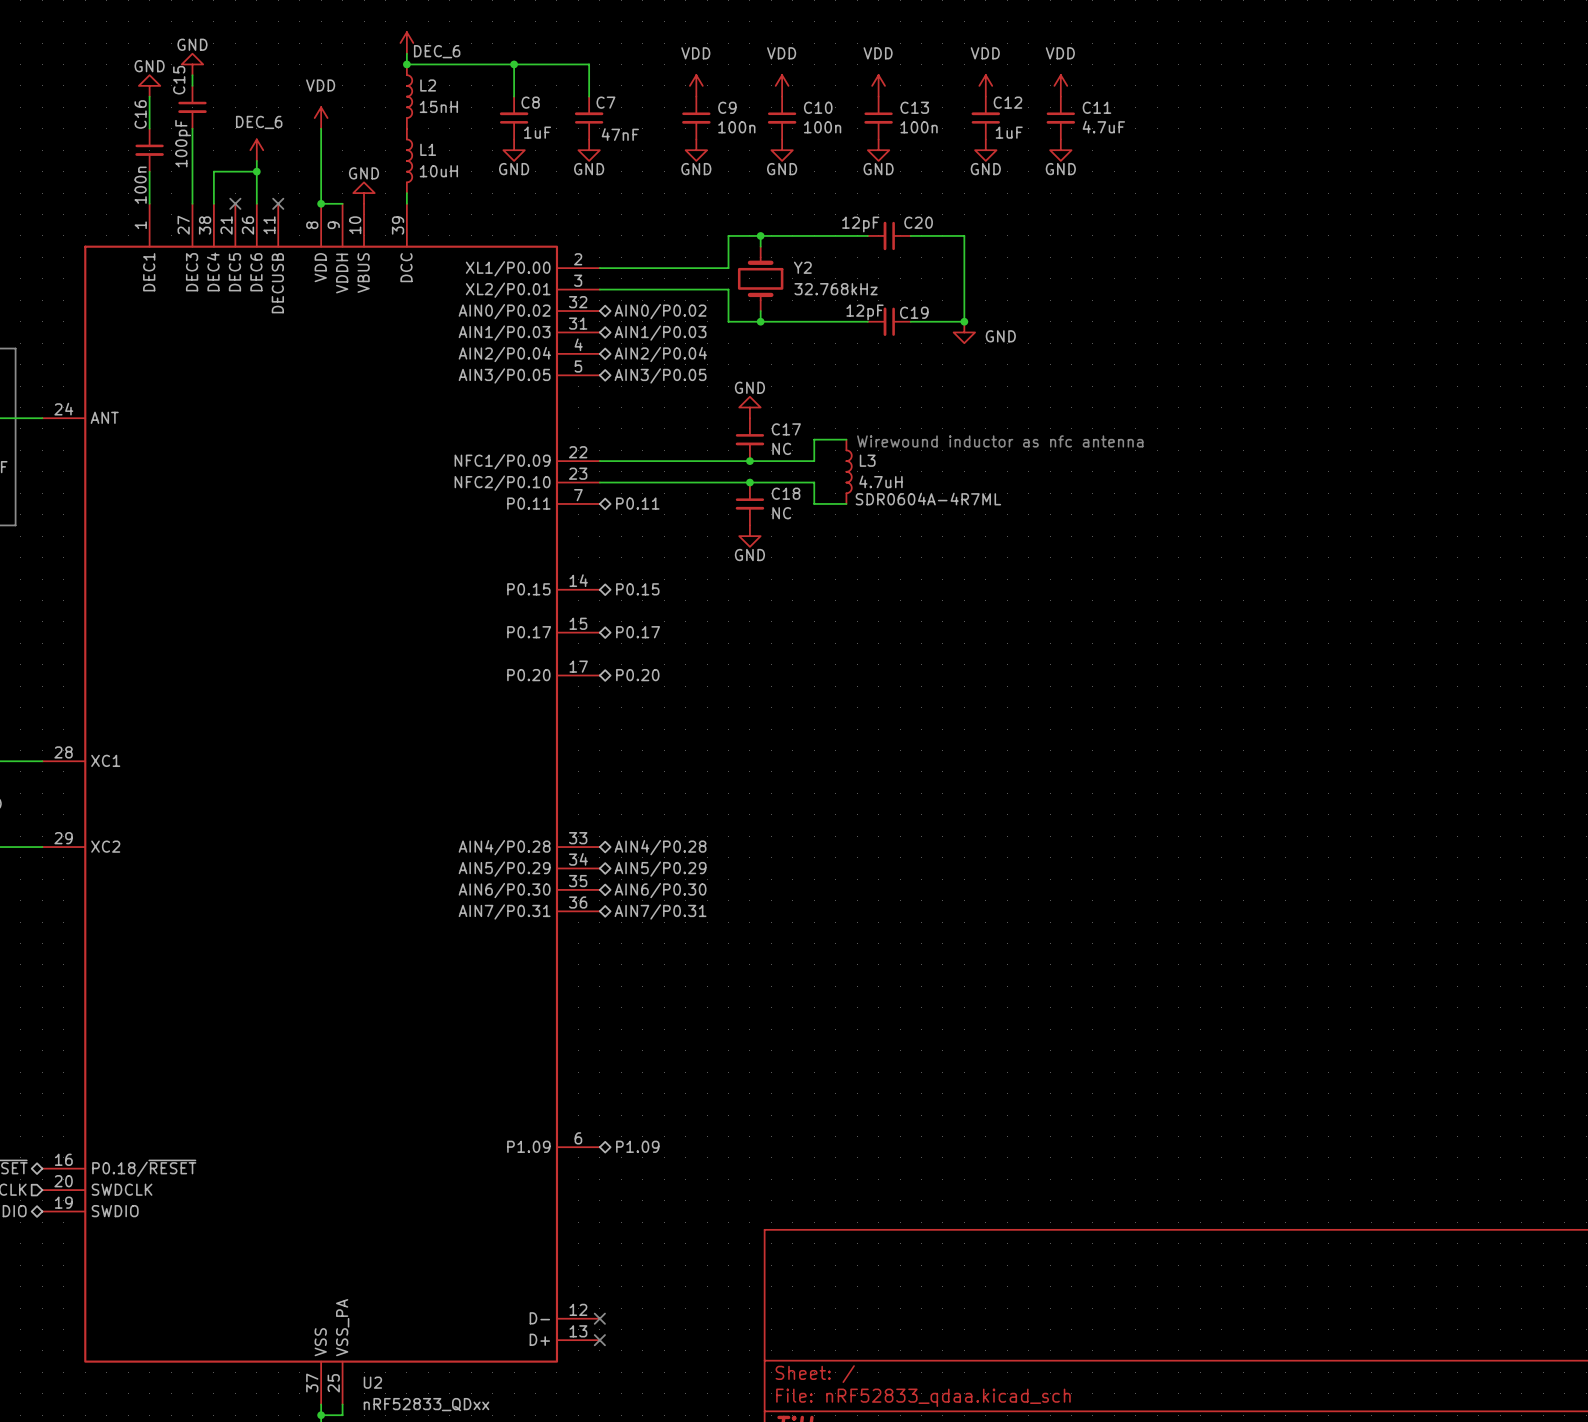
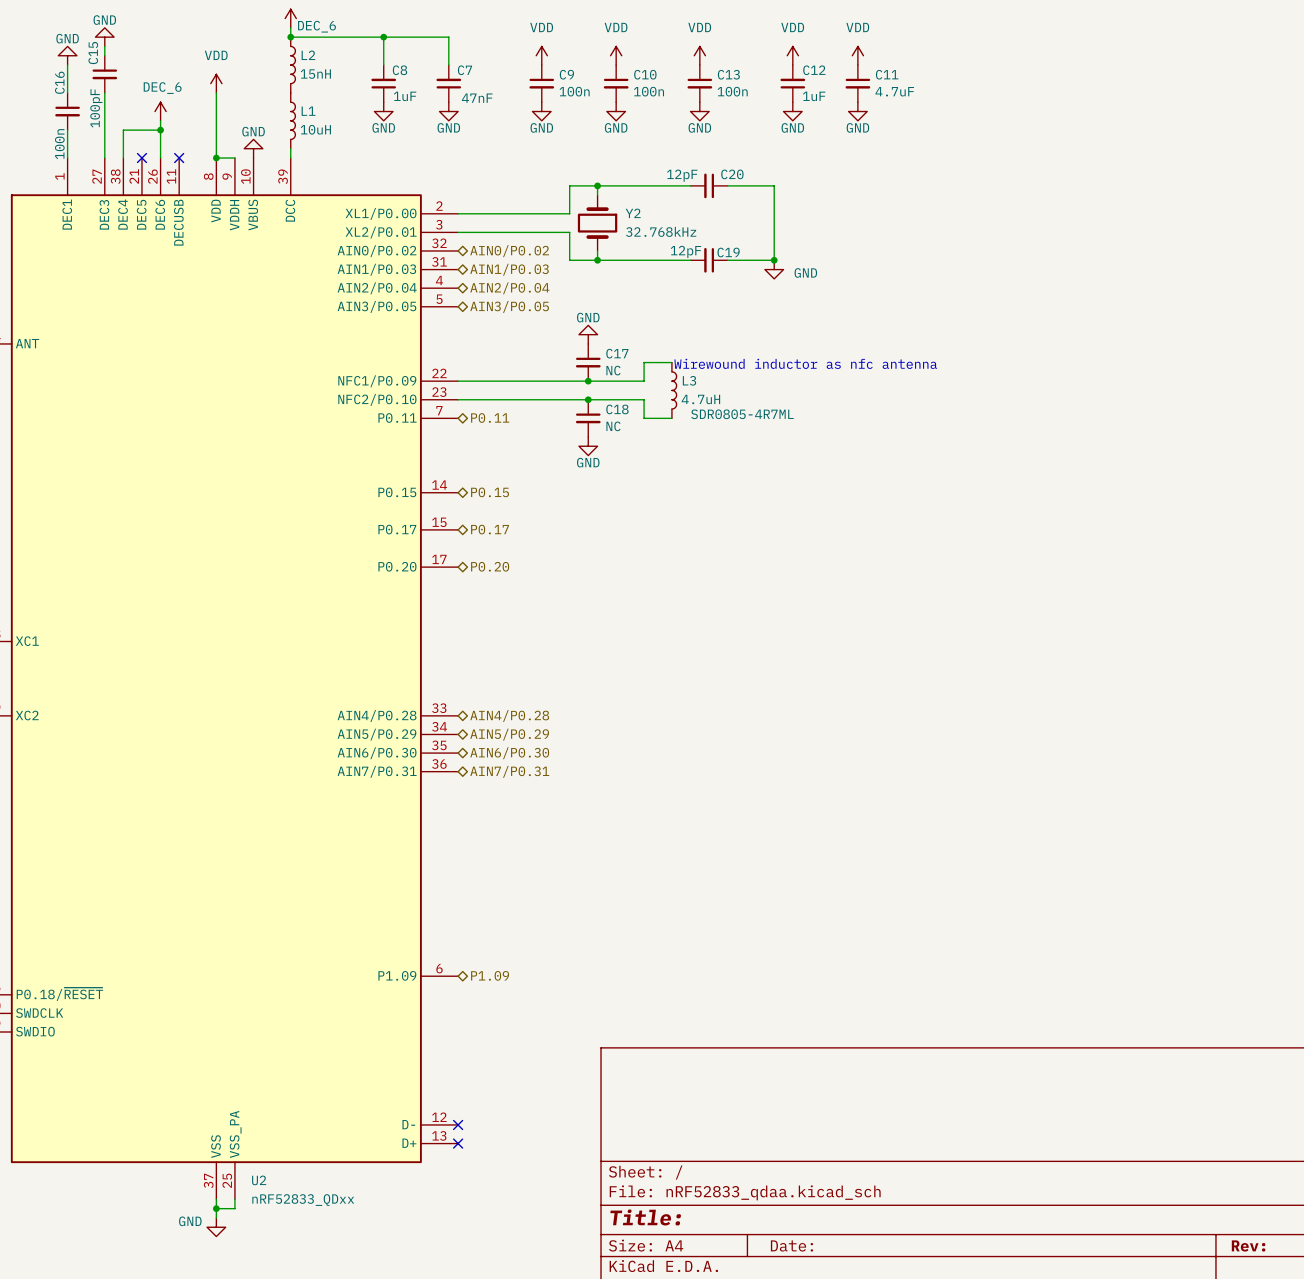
L3 text: SDR0604A-4R7ML (928, 499) -> SDR0805-4R7ML (742, 414)

